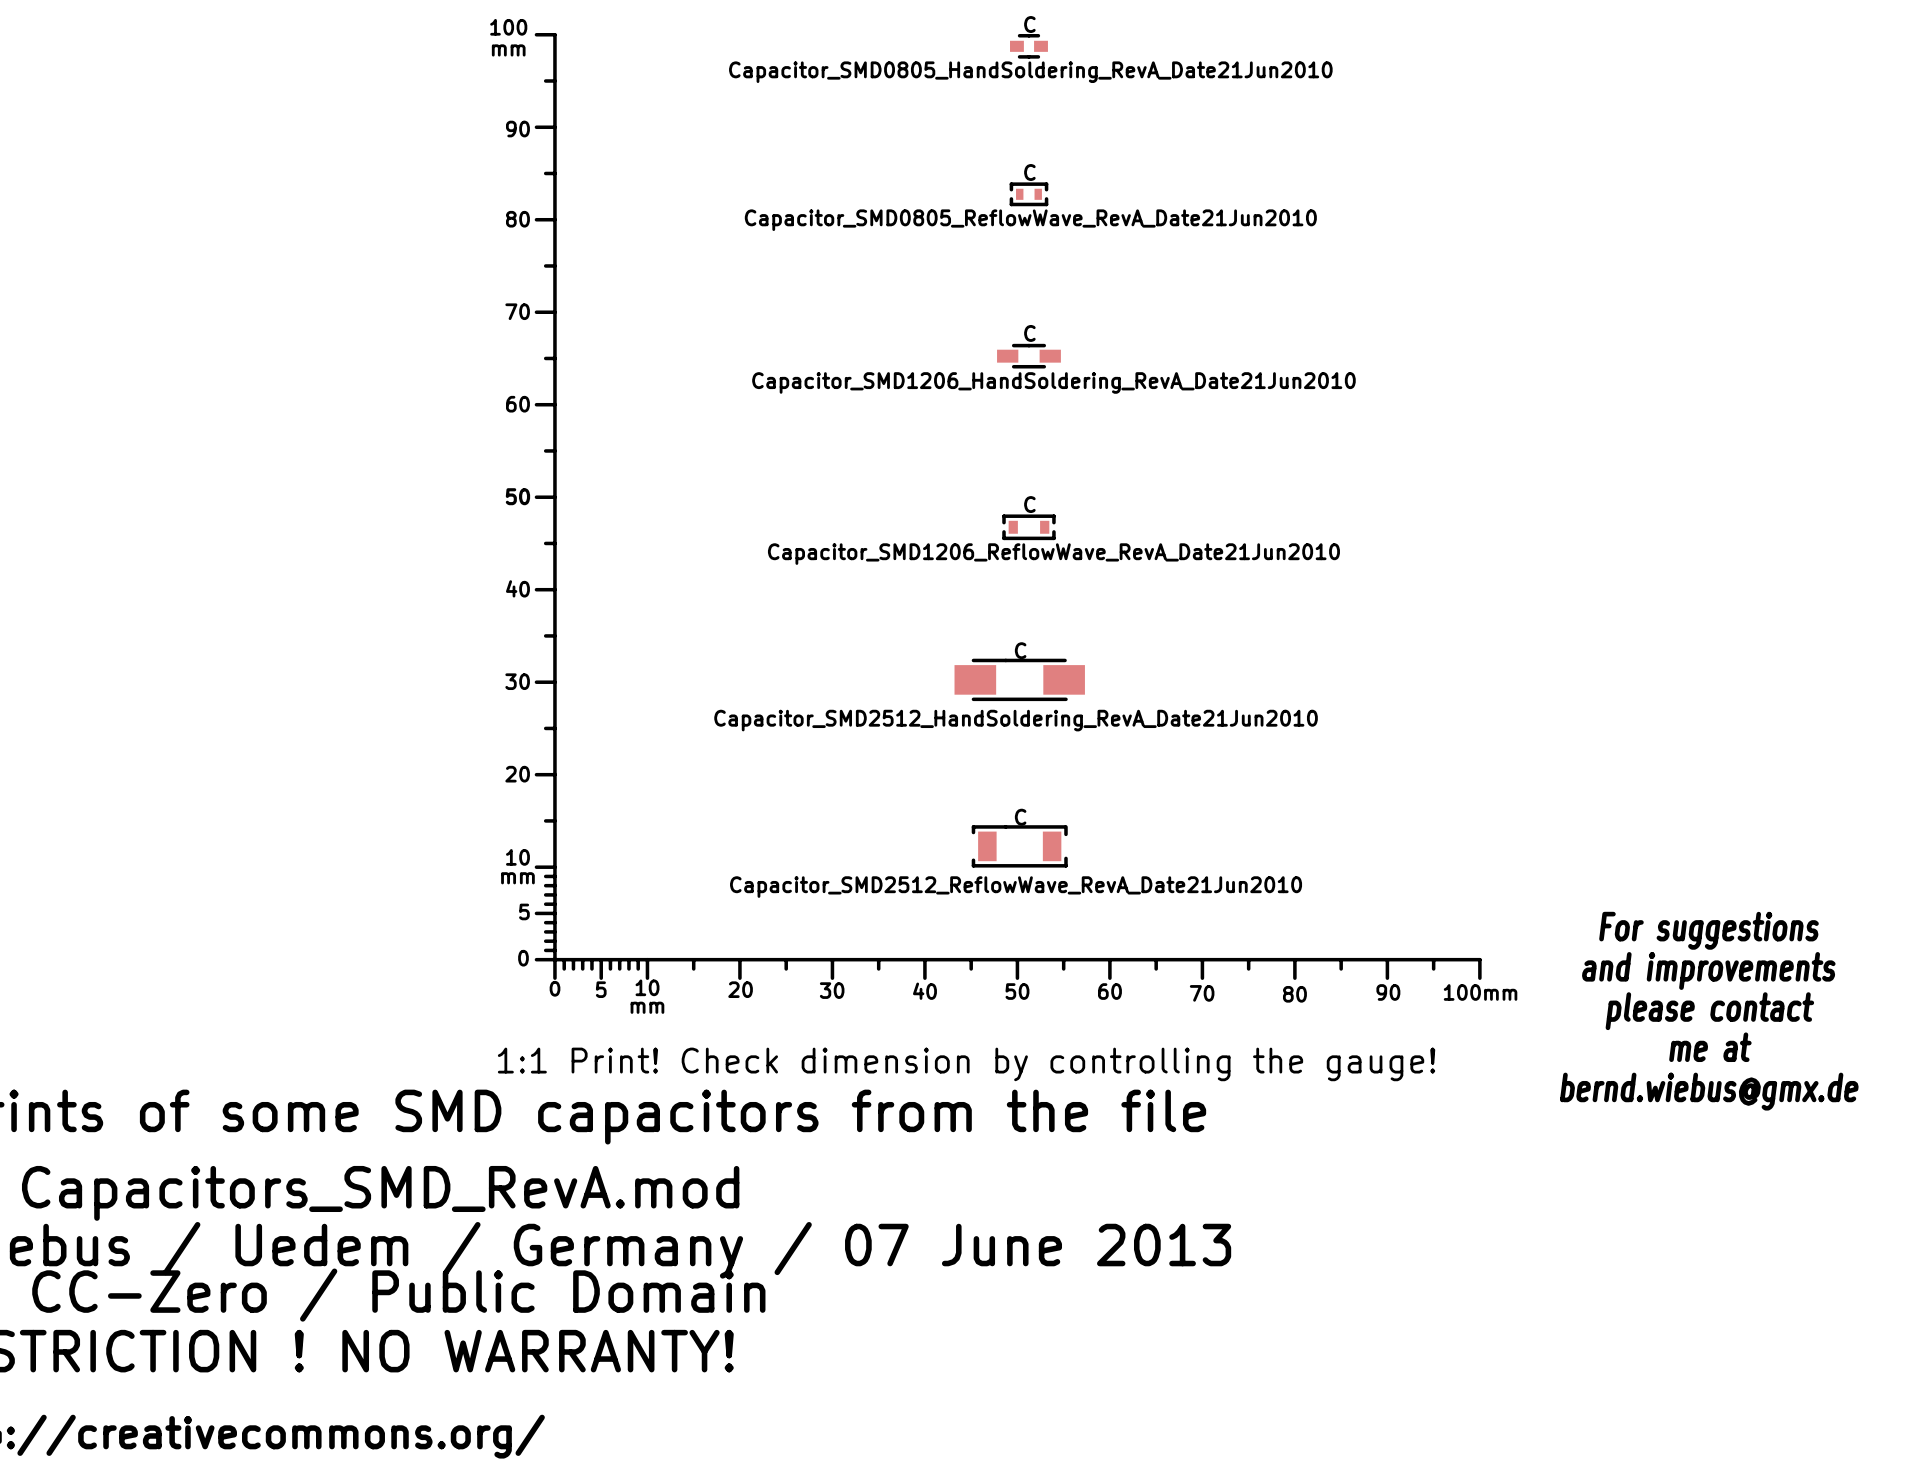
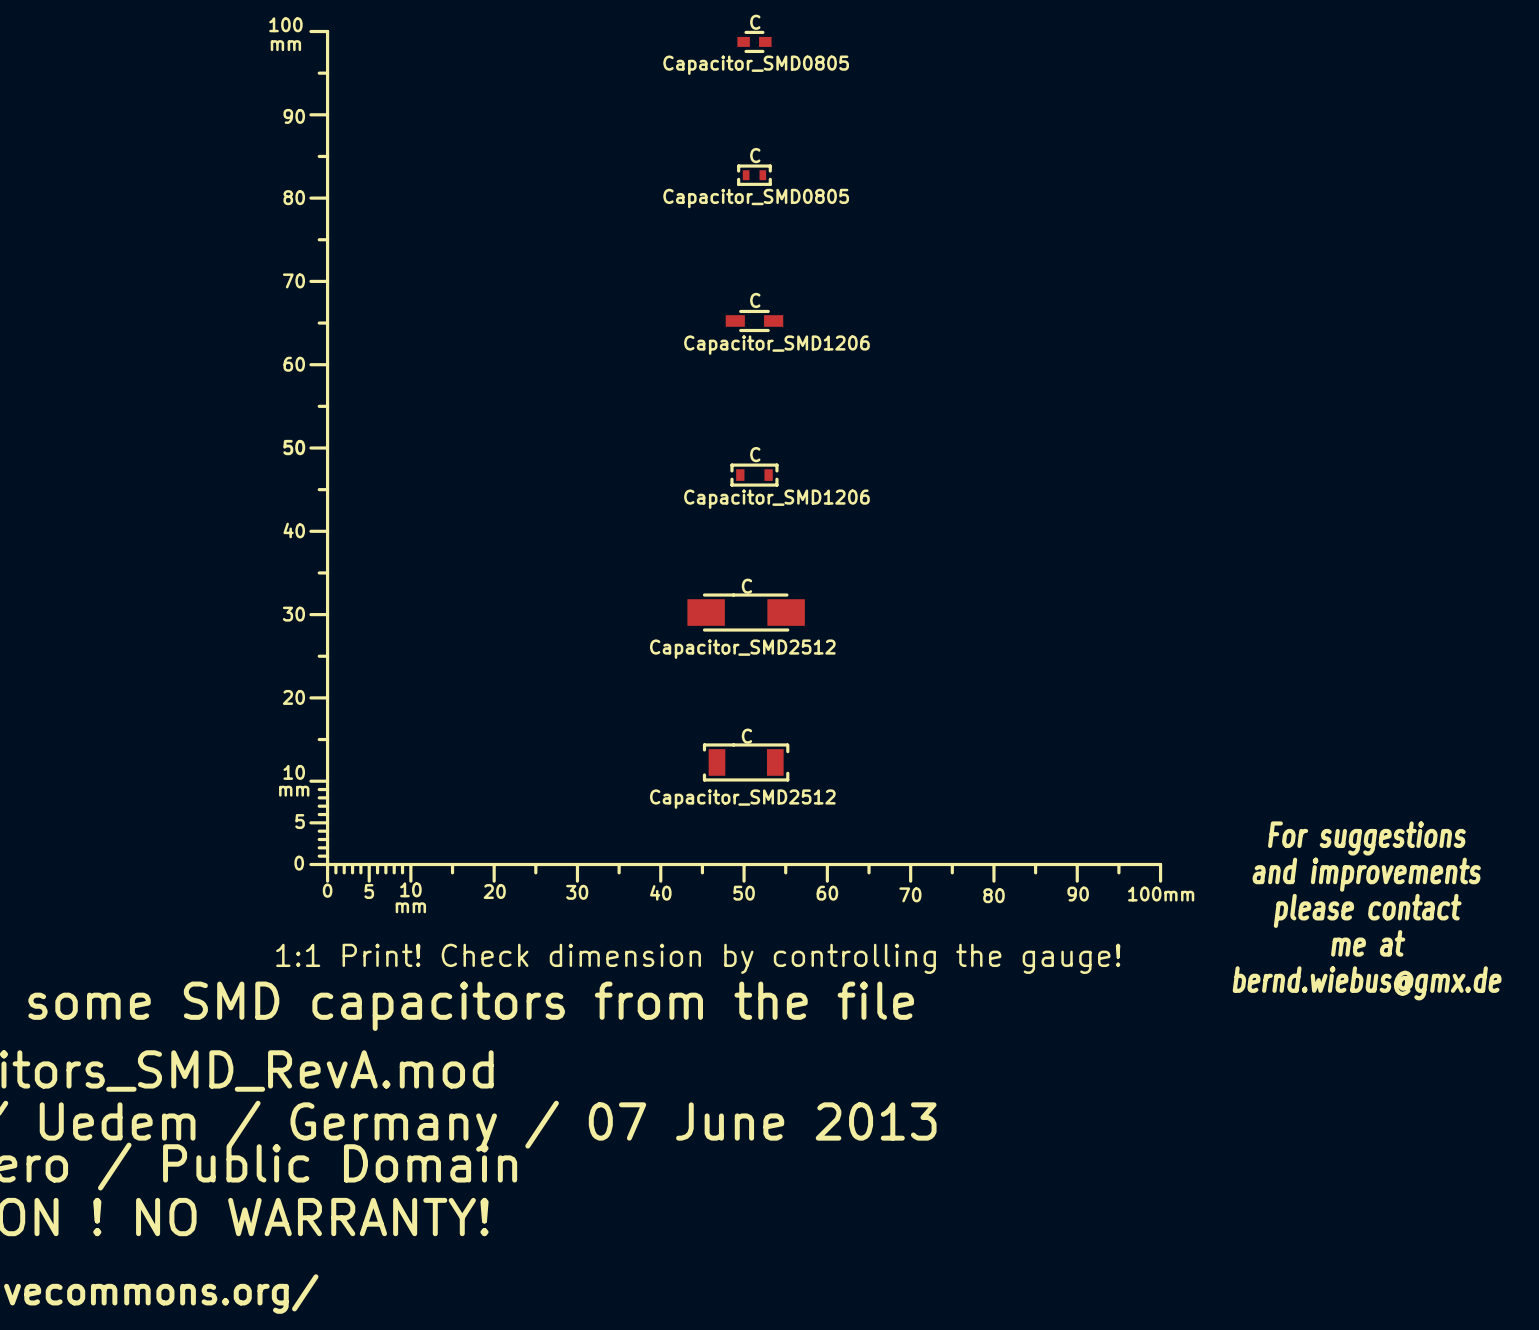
C value: Capacitor_SMD0805_HandSoldering_RevA_Date21Jun2010 (1030, 72) -> Capacitor_SMD0805 (756, 65)
C value: Capacitor_SMD0805_ReflowWave_RevA_Date21Jun2010 (1030, 220) -> Capacitor_SMD0805 (756, 198)
C value: Capacitor_SMD1206_HandSoldering_RevA_Date21Jun2010 (1053, 382) -> Capacitor_SMD1206 (776, 345)
C value: Capacitor_SMD1206_ReflowWave_RevA_Date21Jun2010 (1053, 554) -> Capacitor_SMD1206 (776, 499)
C value: Capacitor_SMD2512_HandSoldering_RevA_Date21Jun2010 (1016, 720) -> Capacitor_SMD2512 (742, 649)
C value: Capacitor_SMD2512_ReflowWave_RevA_Date21Jun2010 (1016, 887) -> Capacitor_SMD2512 (742, 799)

